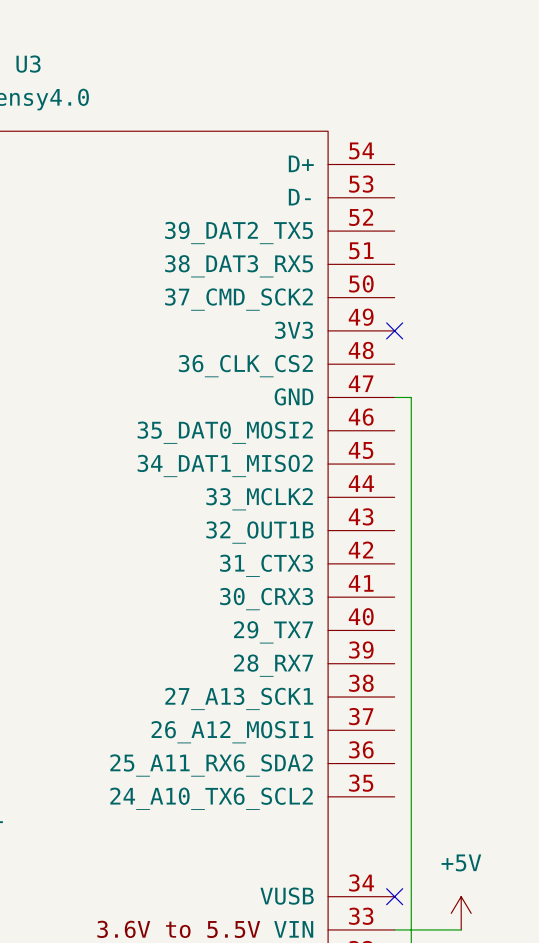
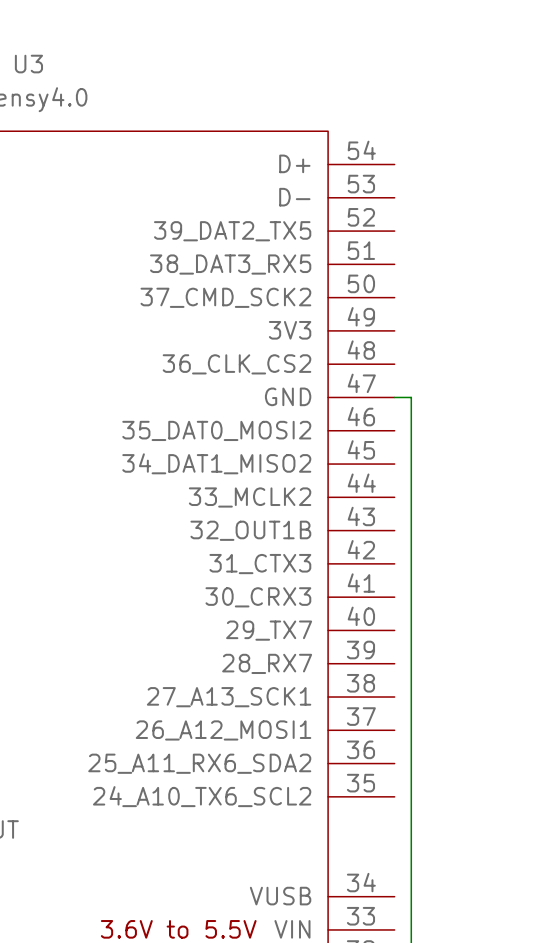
no-connect mark: (394, 330) -> none
no-connect mark: (394, 896) -> none
power symbol: +5V (461, 913) -> none
wire: (394, 929) (461, 929) -> none

